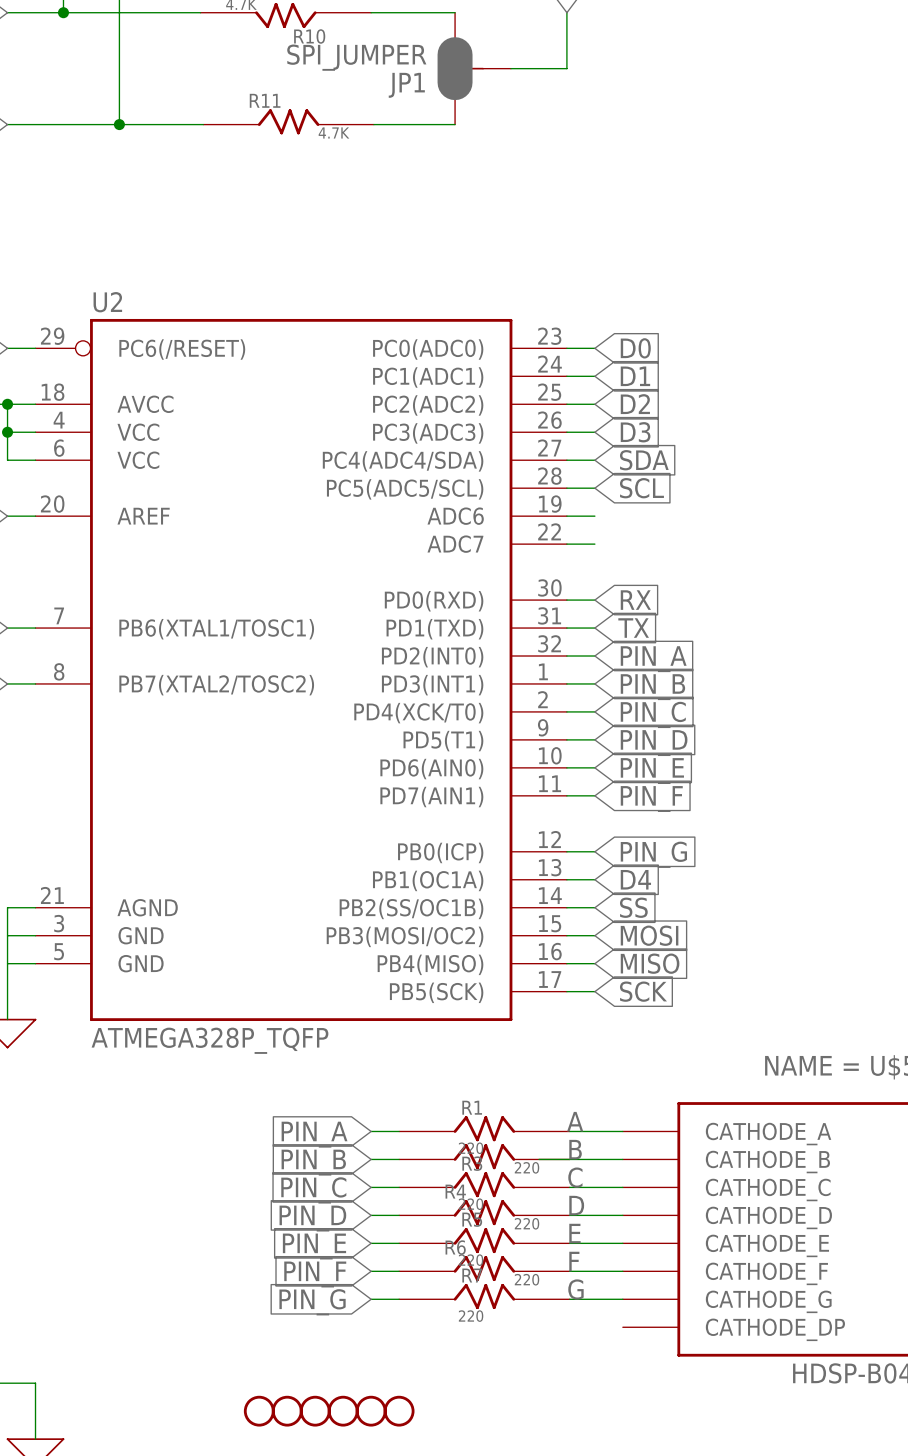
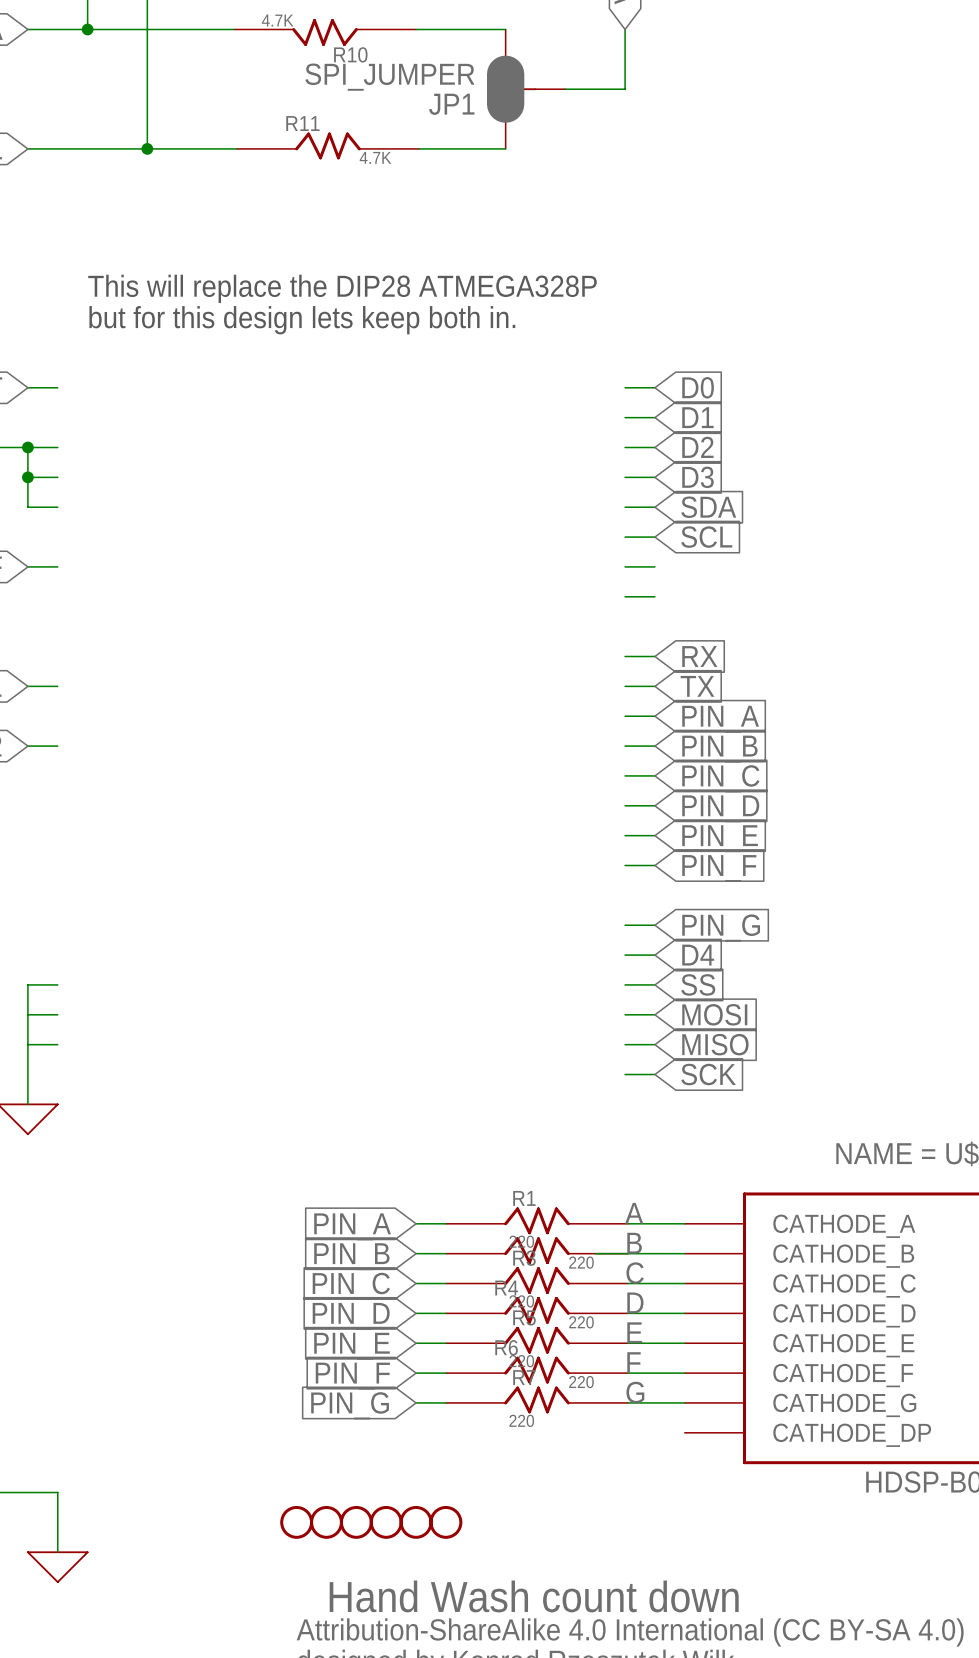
text: none -> This will replace the DIP28 ATMEGA328P (342, 288)
text: none -> but for this design lets keep both in. (302, 320)
U2: ATMEGA328P_TQFP (301, 669) -> none

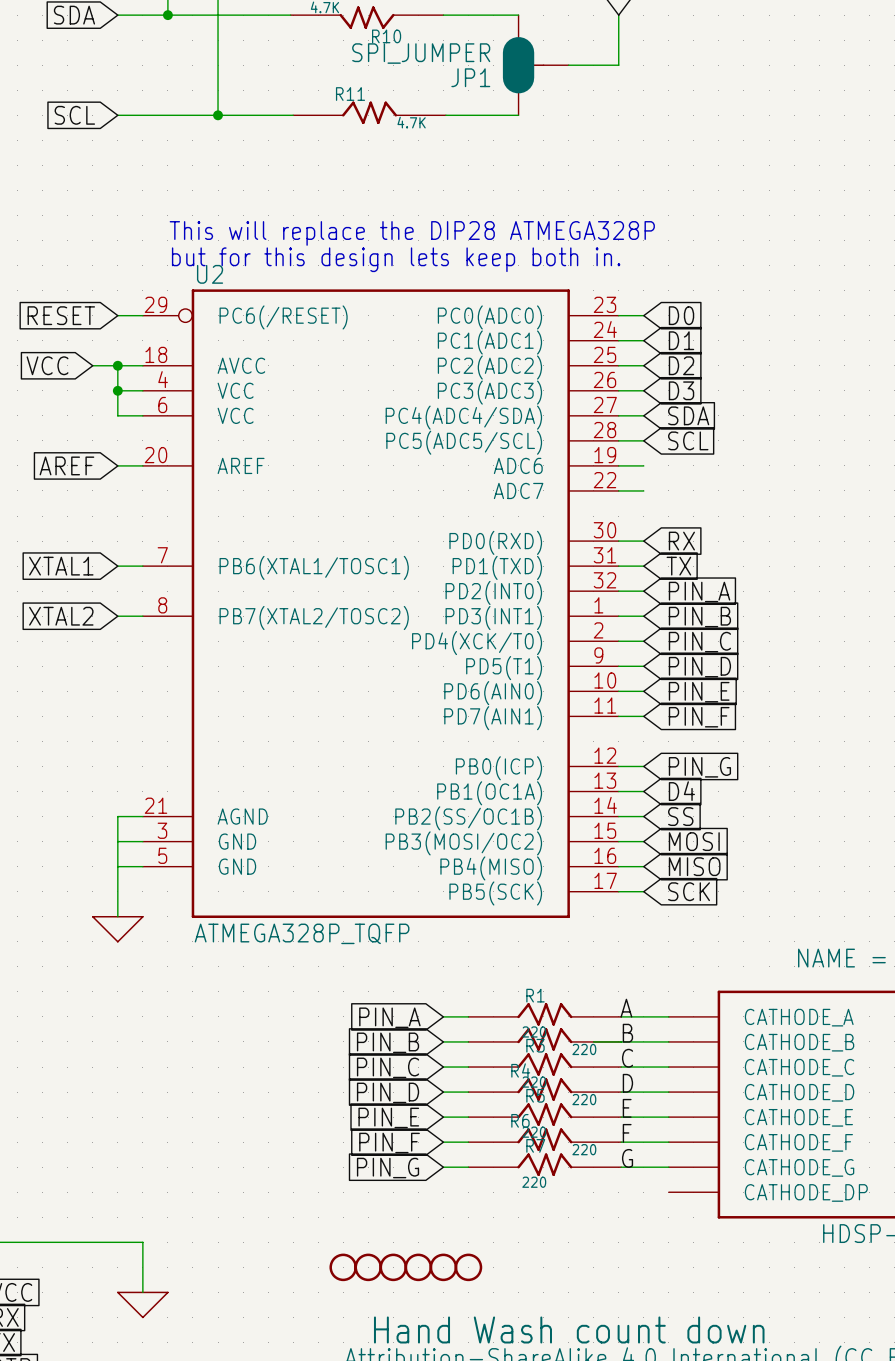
U2: none -> ATMEGA328P_TQFP (380, 603)

